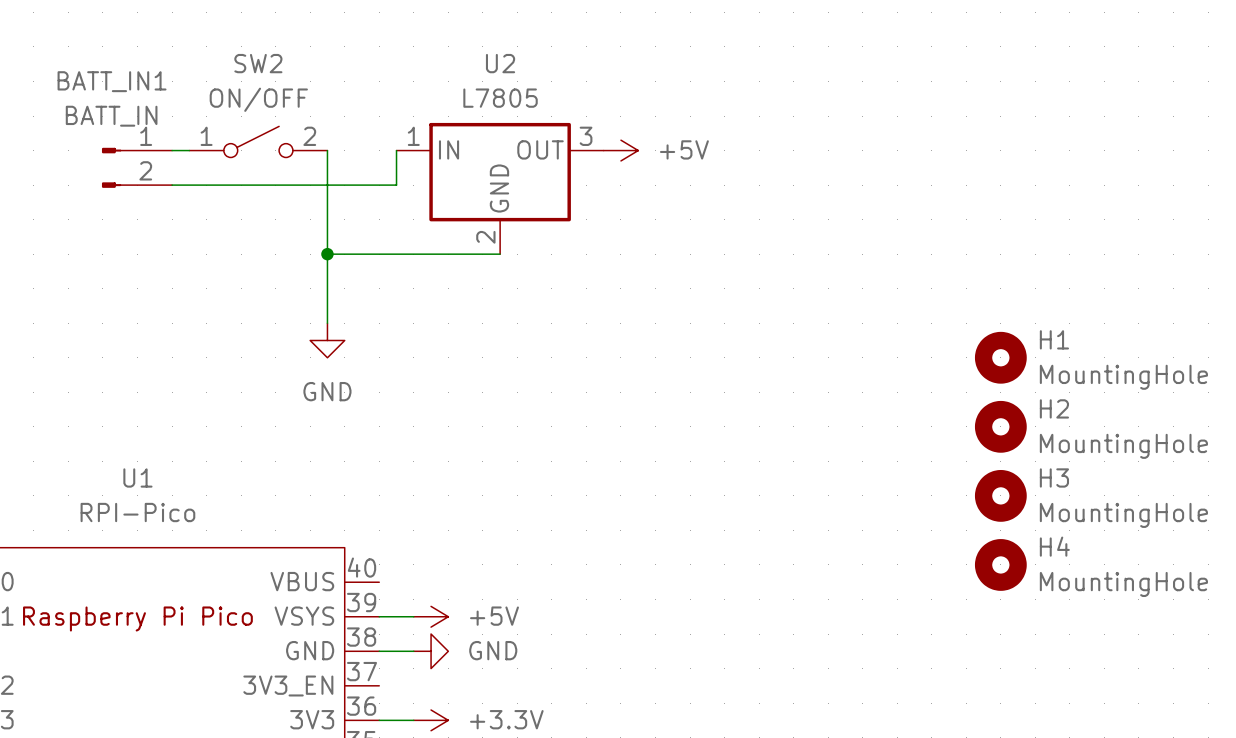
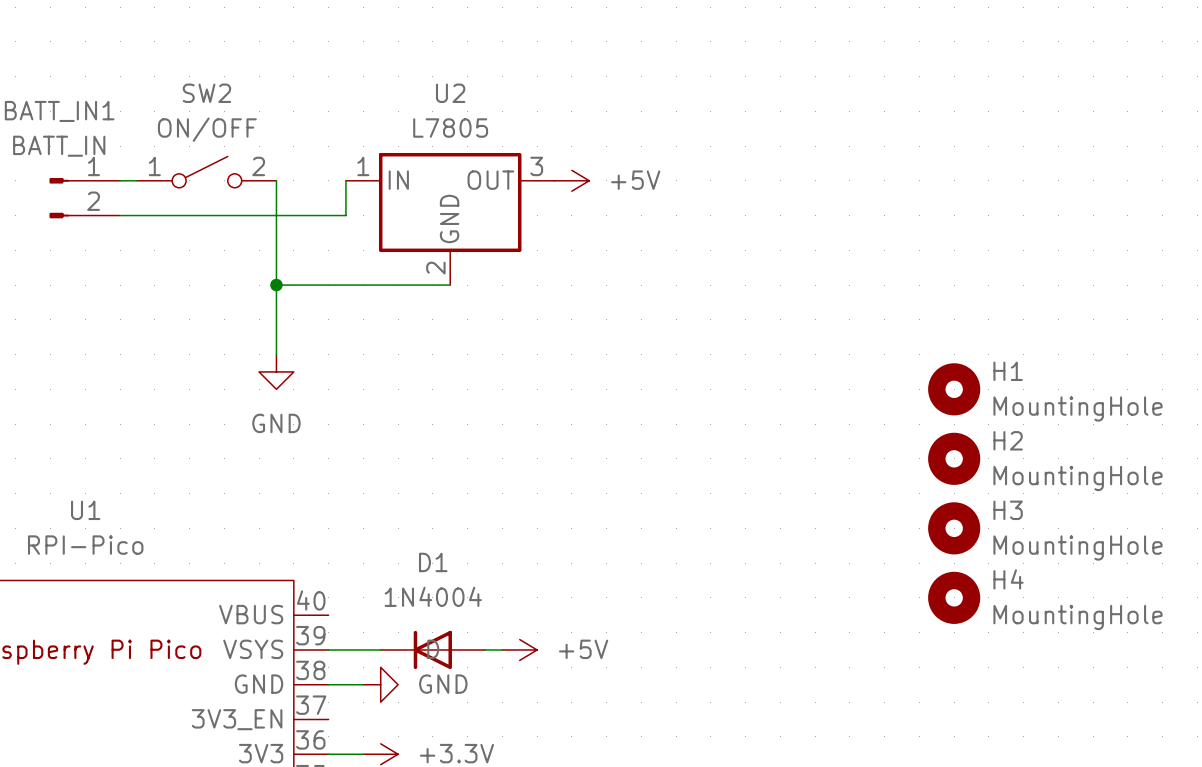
power symbol position: +5V (431, 616) -> +5V (519, 649)
D1: none -> 1N4004 (432, 649)
wire: none -> (484, 649) (502, 649)

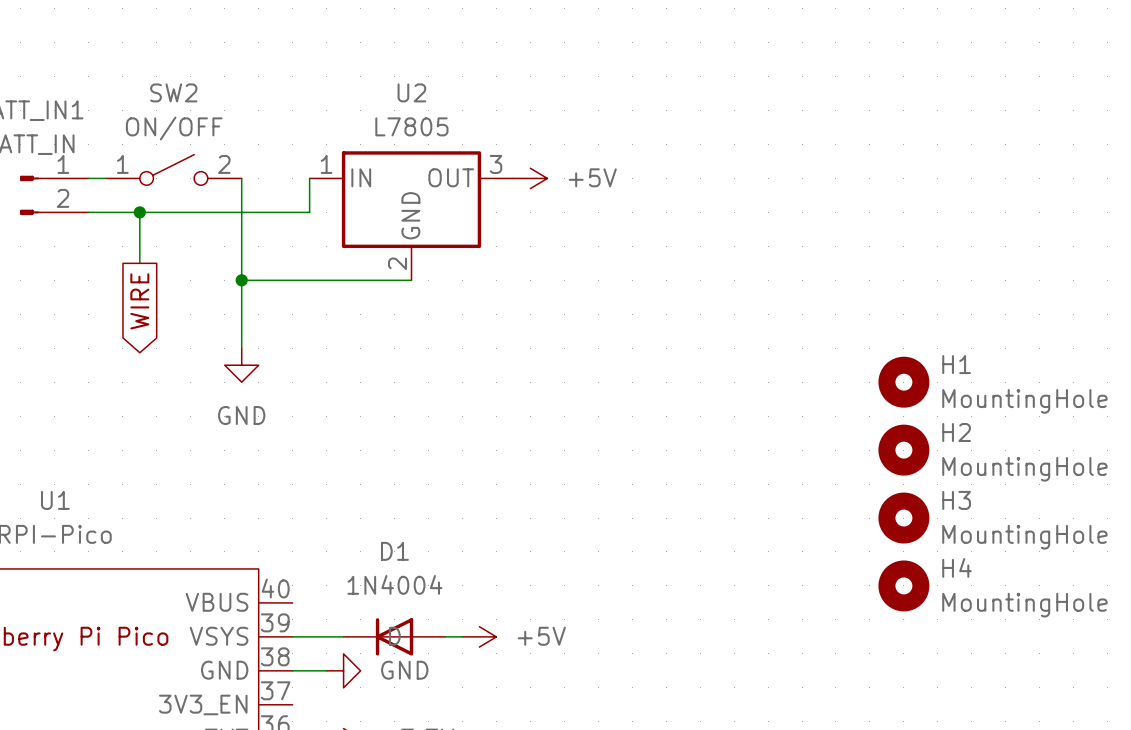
wire: none -> (139, 212) (139, 263)
junction: none -> (139, 212)
global label: none -> WIRE (139, 301)

